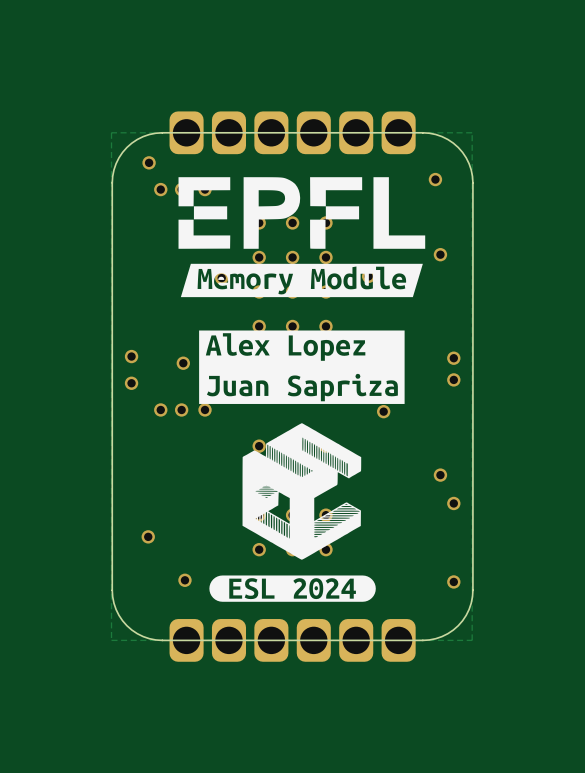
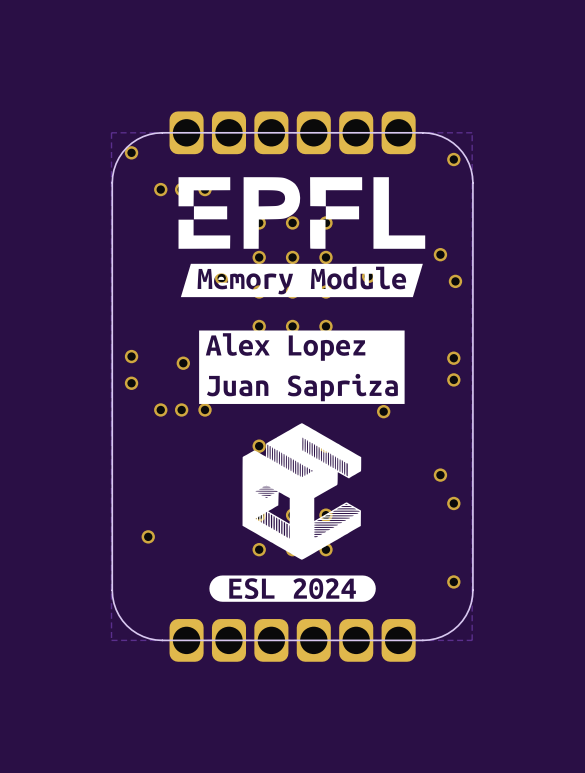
via position: (149, 162) -> (131, 152)
via position: (435, 179) -> (453, 159)
via: none -> (455, 281)
via: (184, 580) -> none

